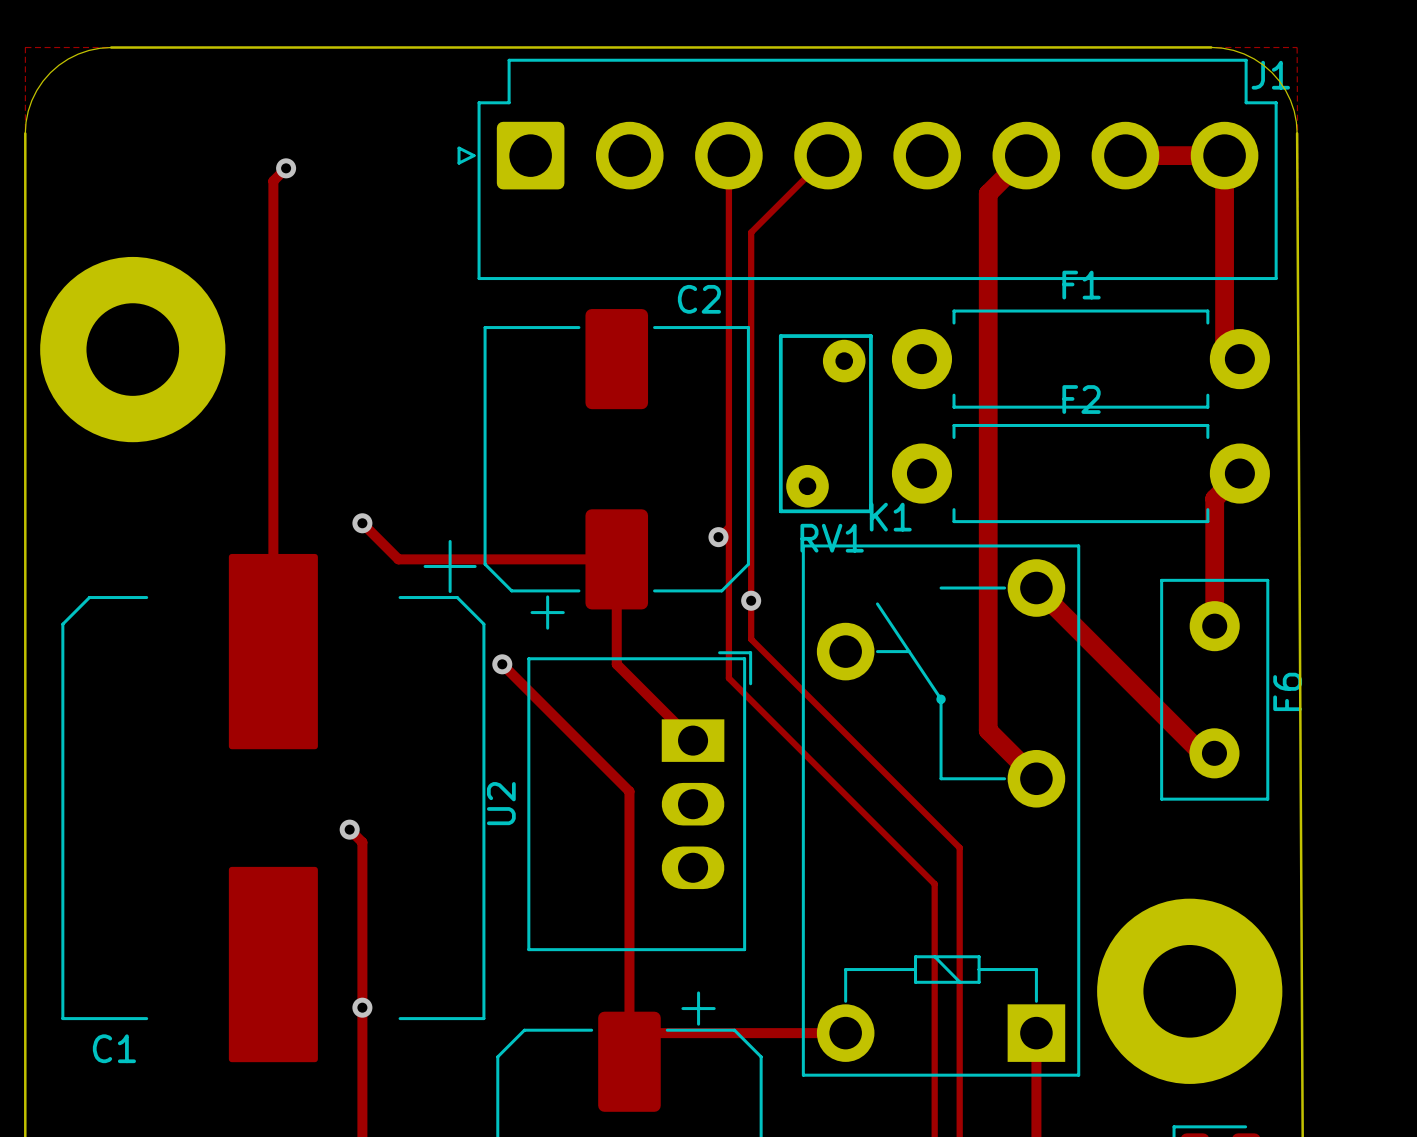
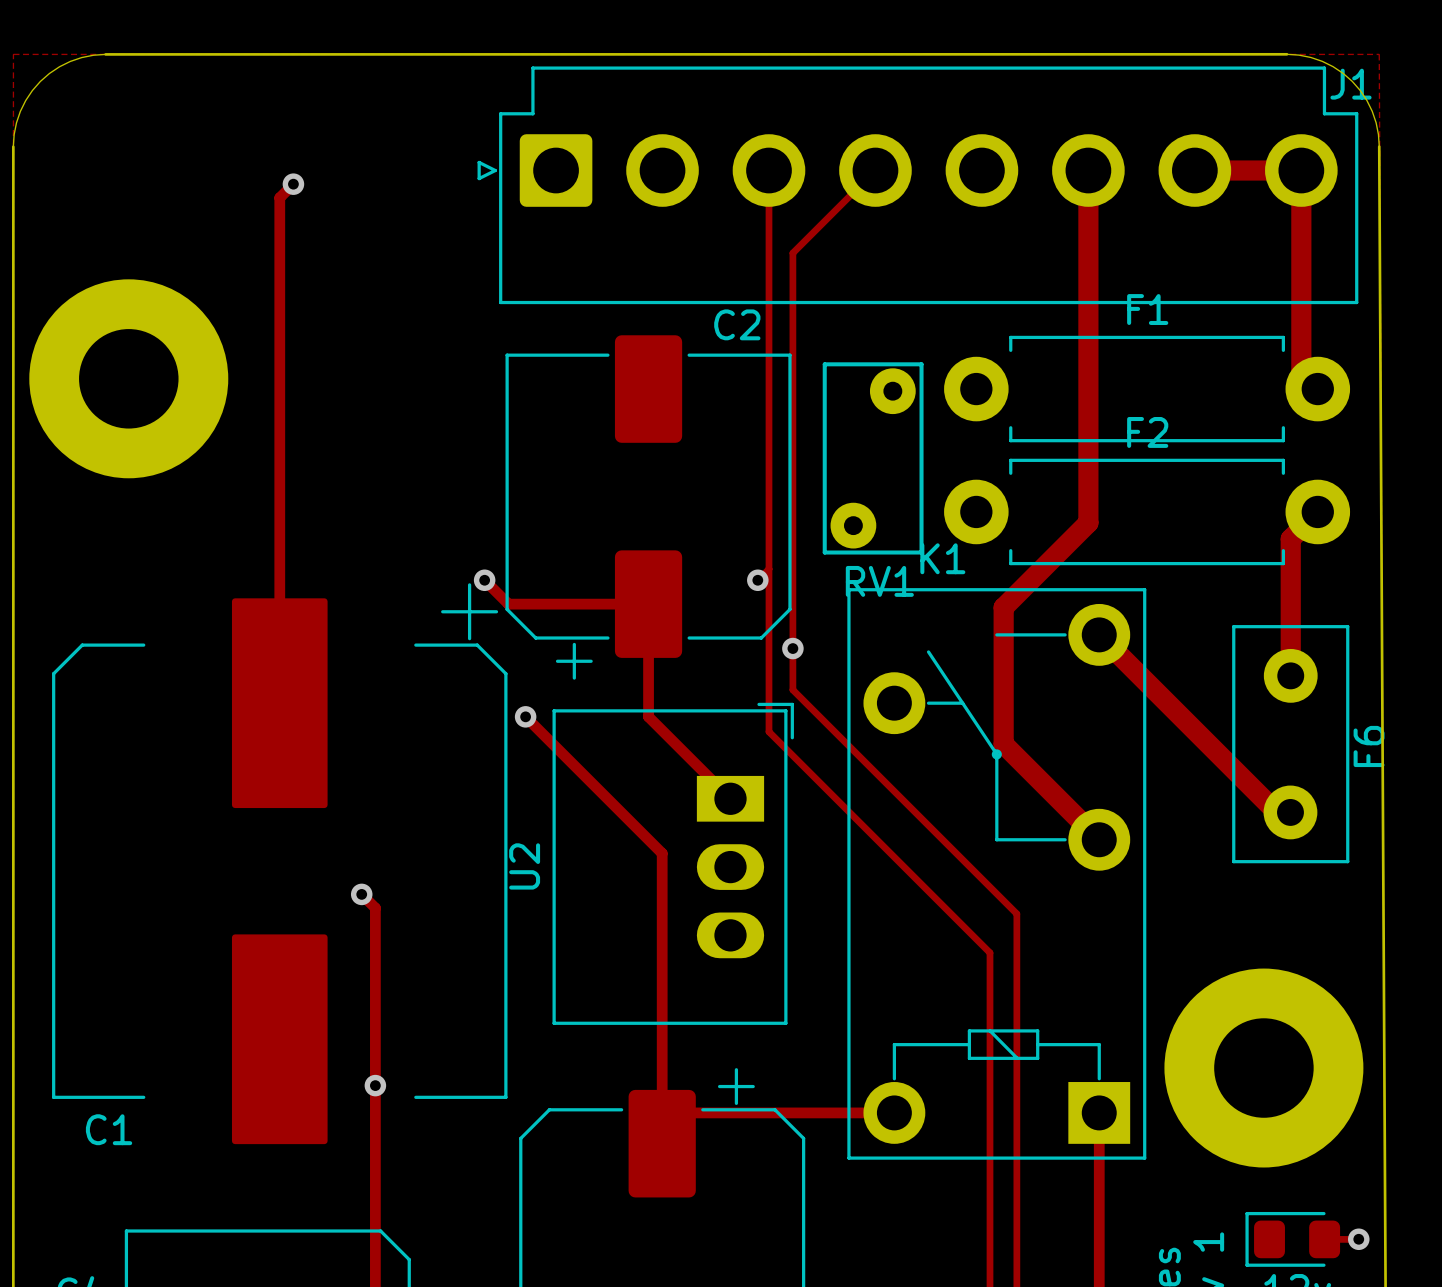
track: (1026, 155) (988, 193) (988, 730) -> (1088, 170) (1088, 522) (1003, 607) (1003, 744) (1047, 788)
track: (362, 523) (398, 559) (486, 559) -> (484, 580) (508, 604)
via position: (362, 523) -> (484, 580)

